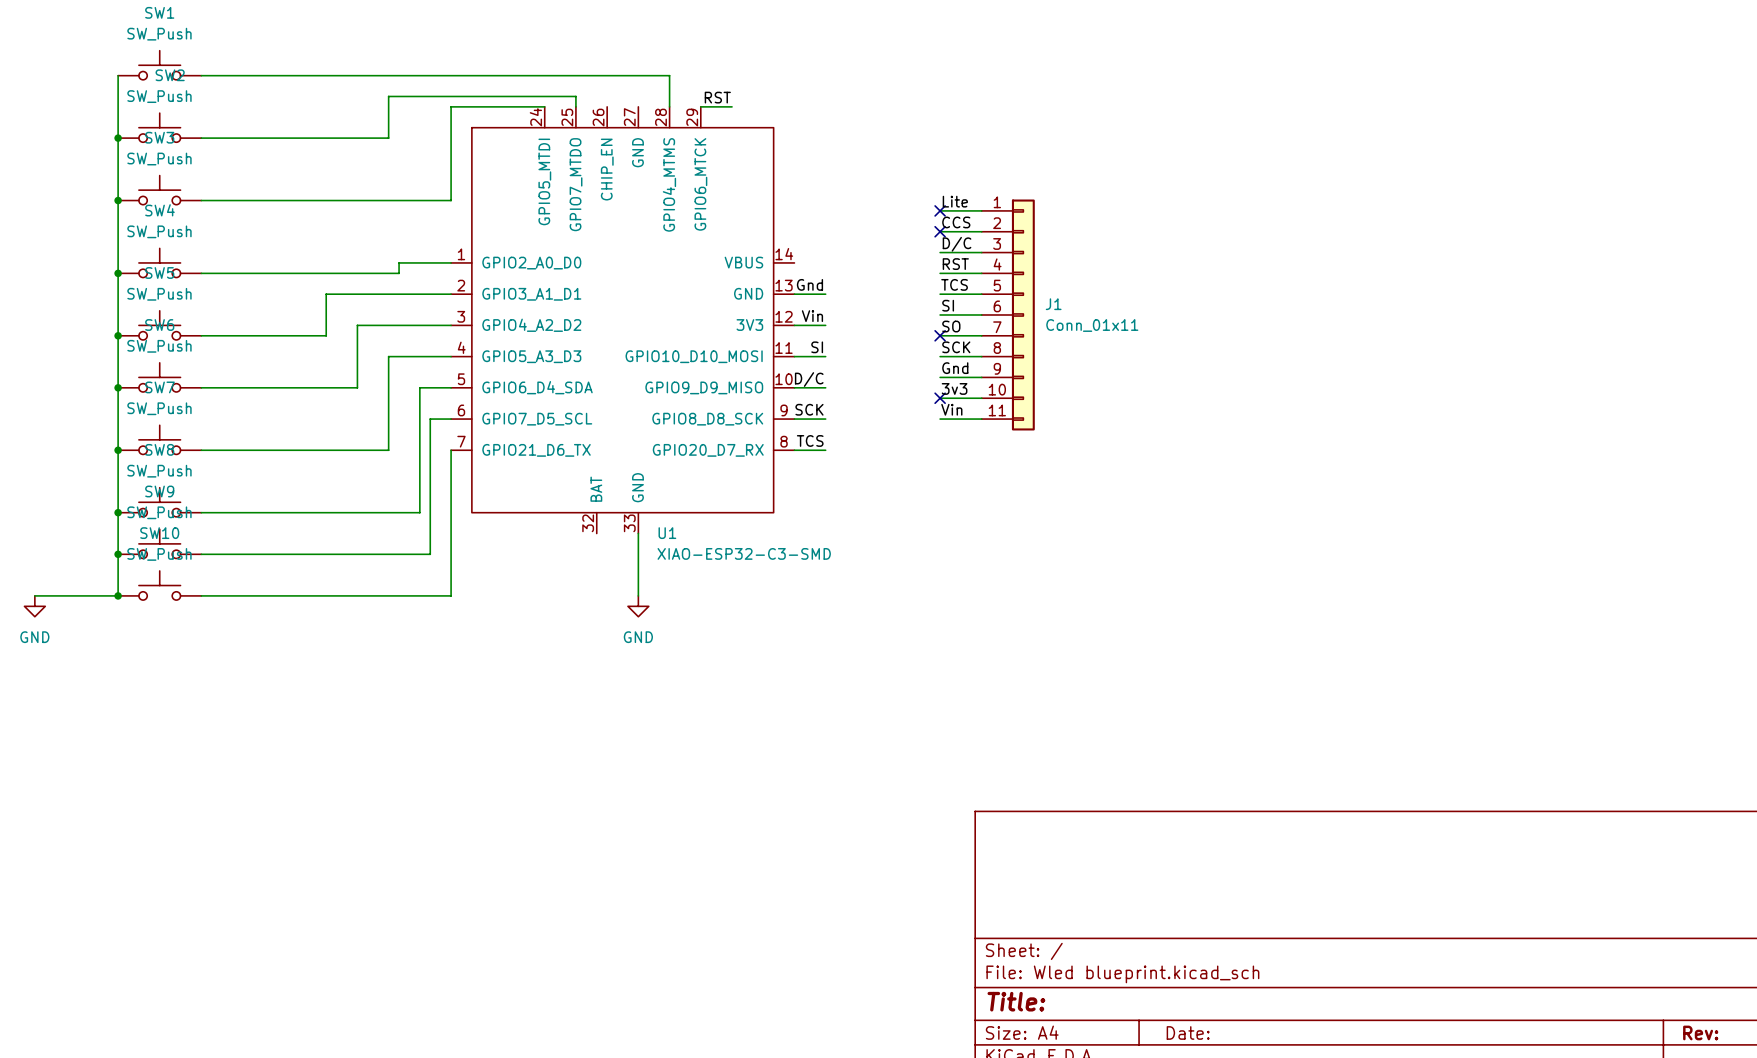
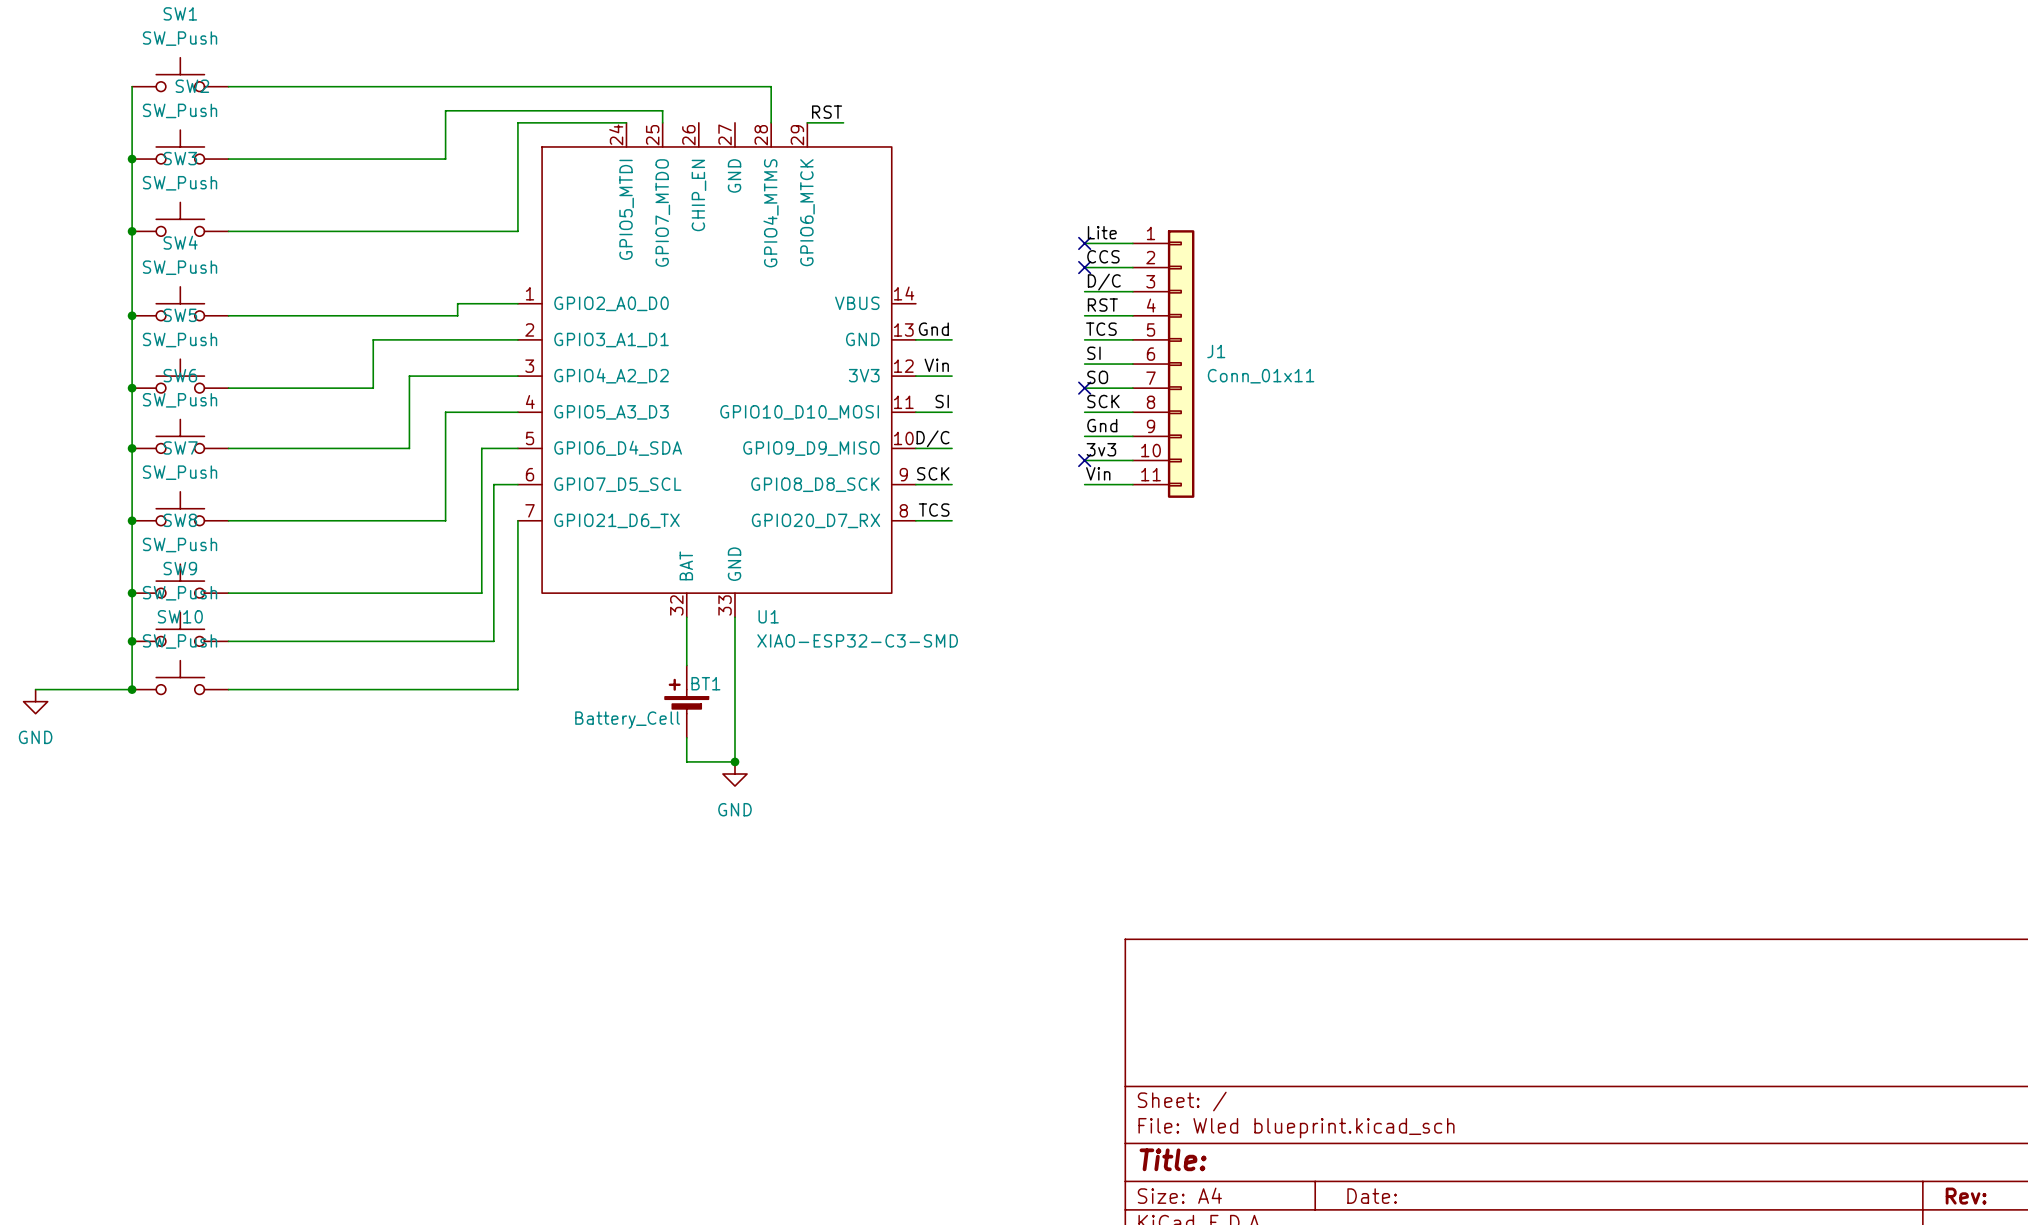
wire: none -> (686, 617) (686, 665)
wire: none -> (734, 689) (734, 761) (686, 761) (686, 737)
BT1: none -> Battery_Cell (686, 701)
power symbol position: GND (638, 606) -> GND (734, 774)
junction: none -> (734, 761)

